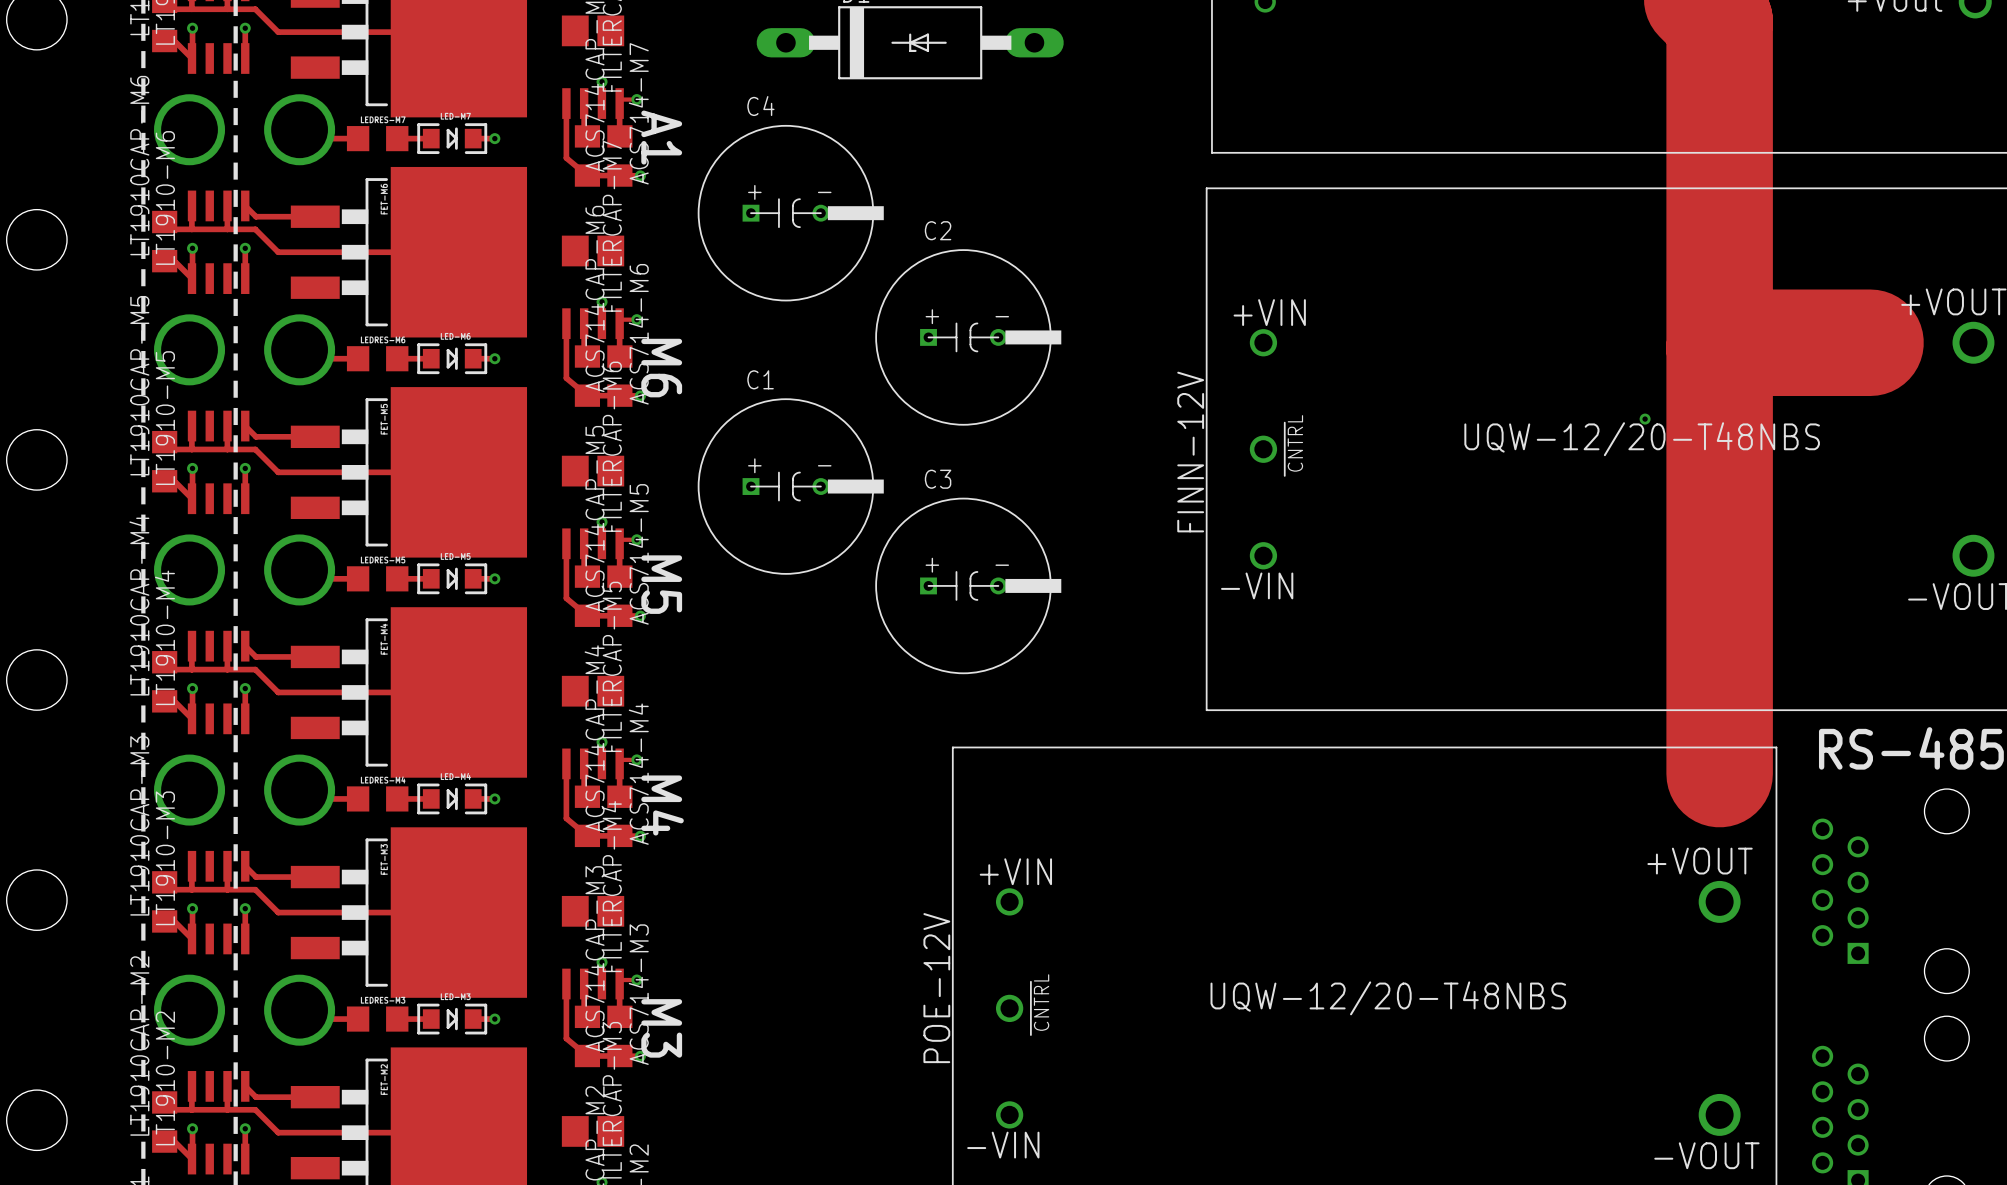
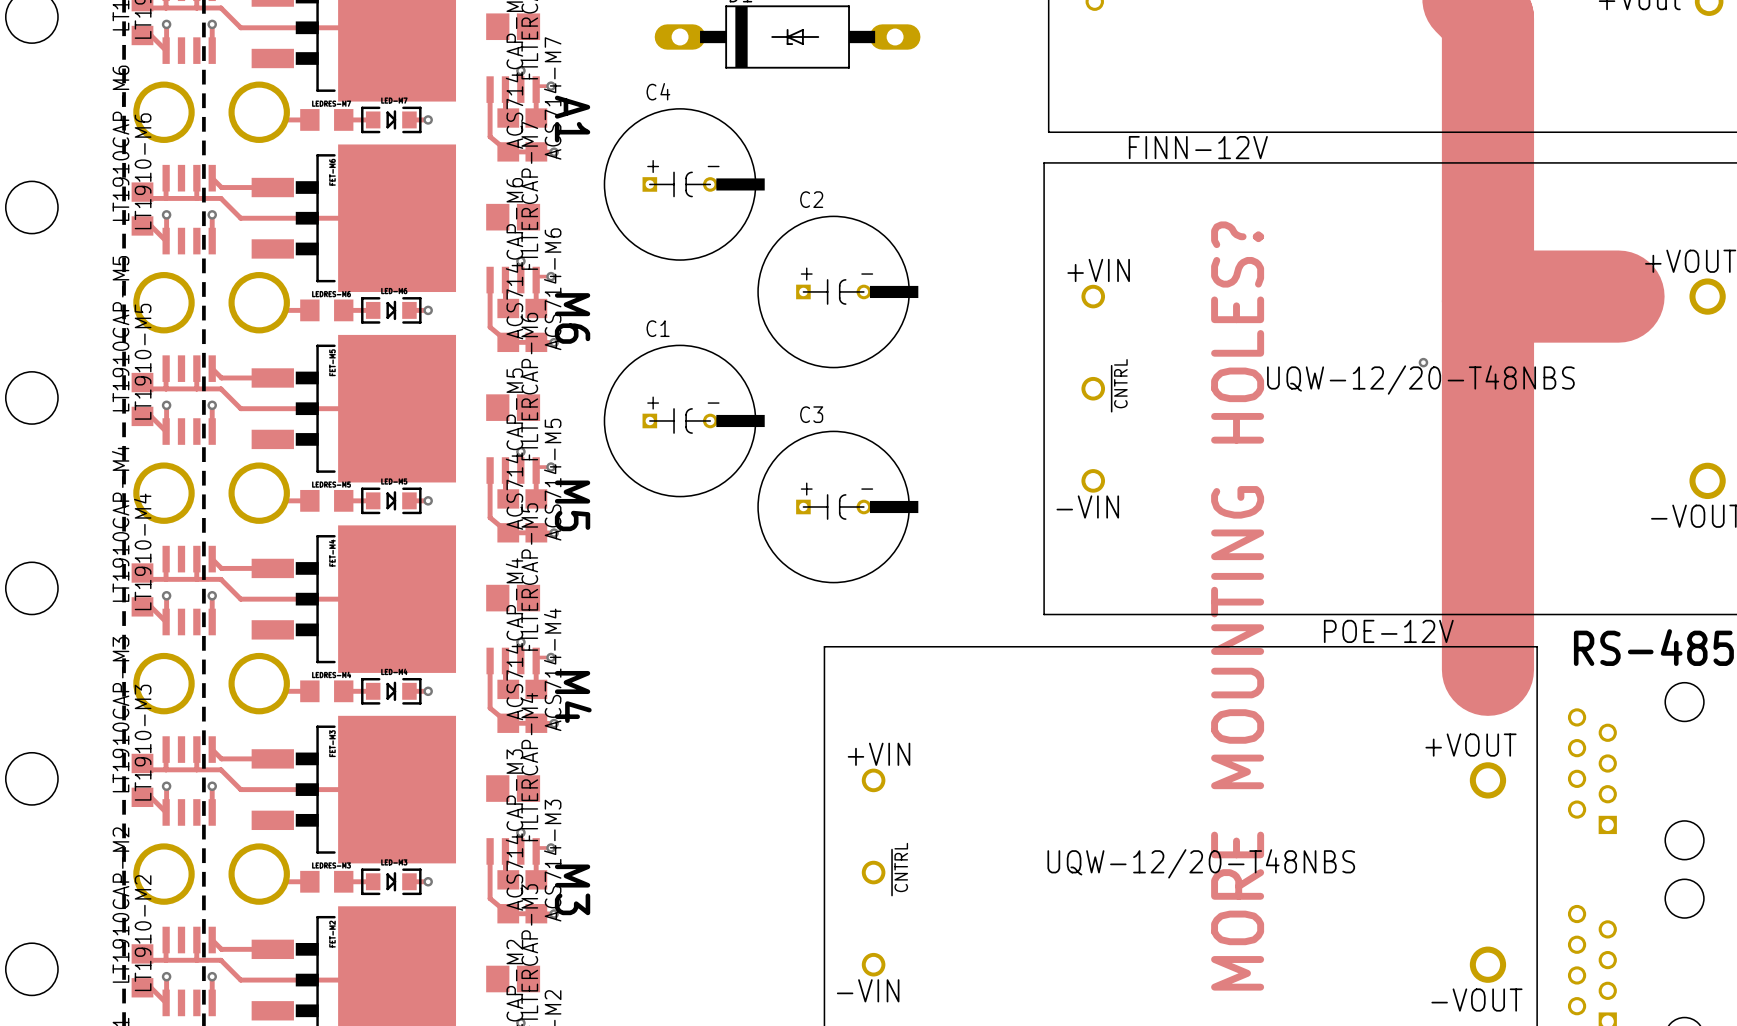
FINN-12V name rotation: 0° (1190, 452) -> 90° clockwise (1198, 147)
FINN-12V name position: FINN-12V (1190, 452) -> FINN-12V (1198, 147)
text: none -> MORE MOUNTING HOLES? (1237, 606)
POE-12V name rotation: 0° (936, 988) -> 90° clockwise (1388, 631)
POE-12V name position: POE-12V (936, 988) -> POE-12V (1388, 631)

